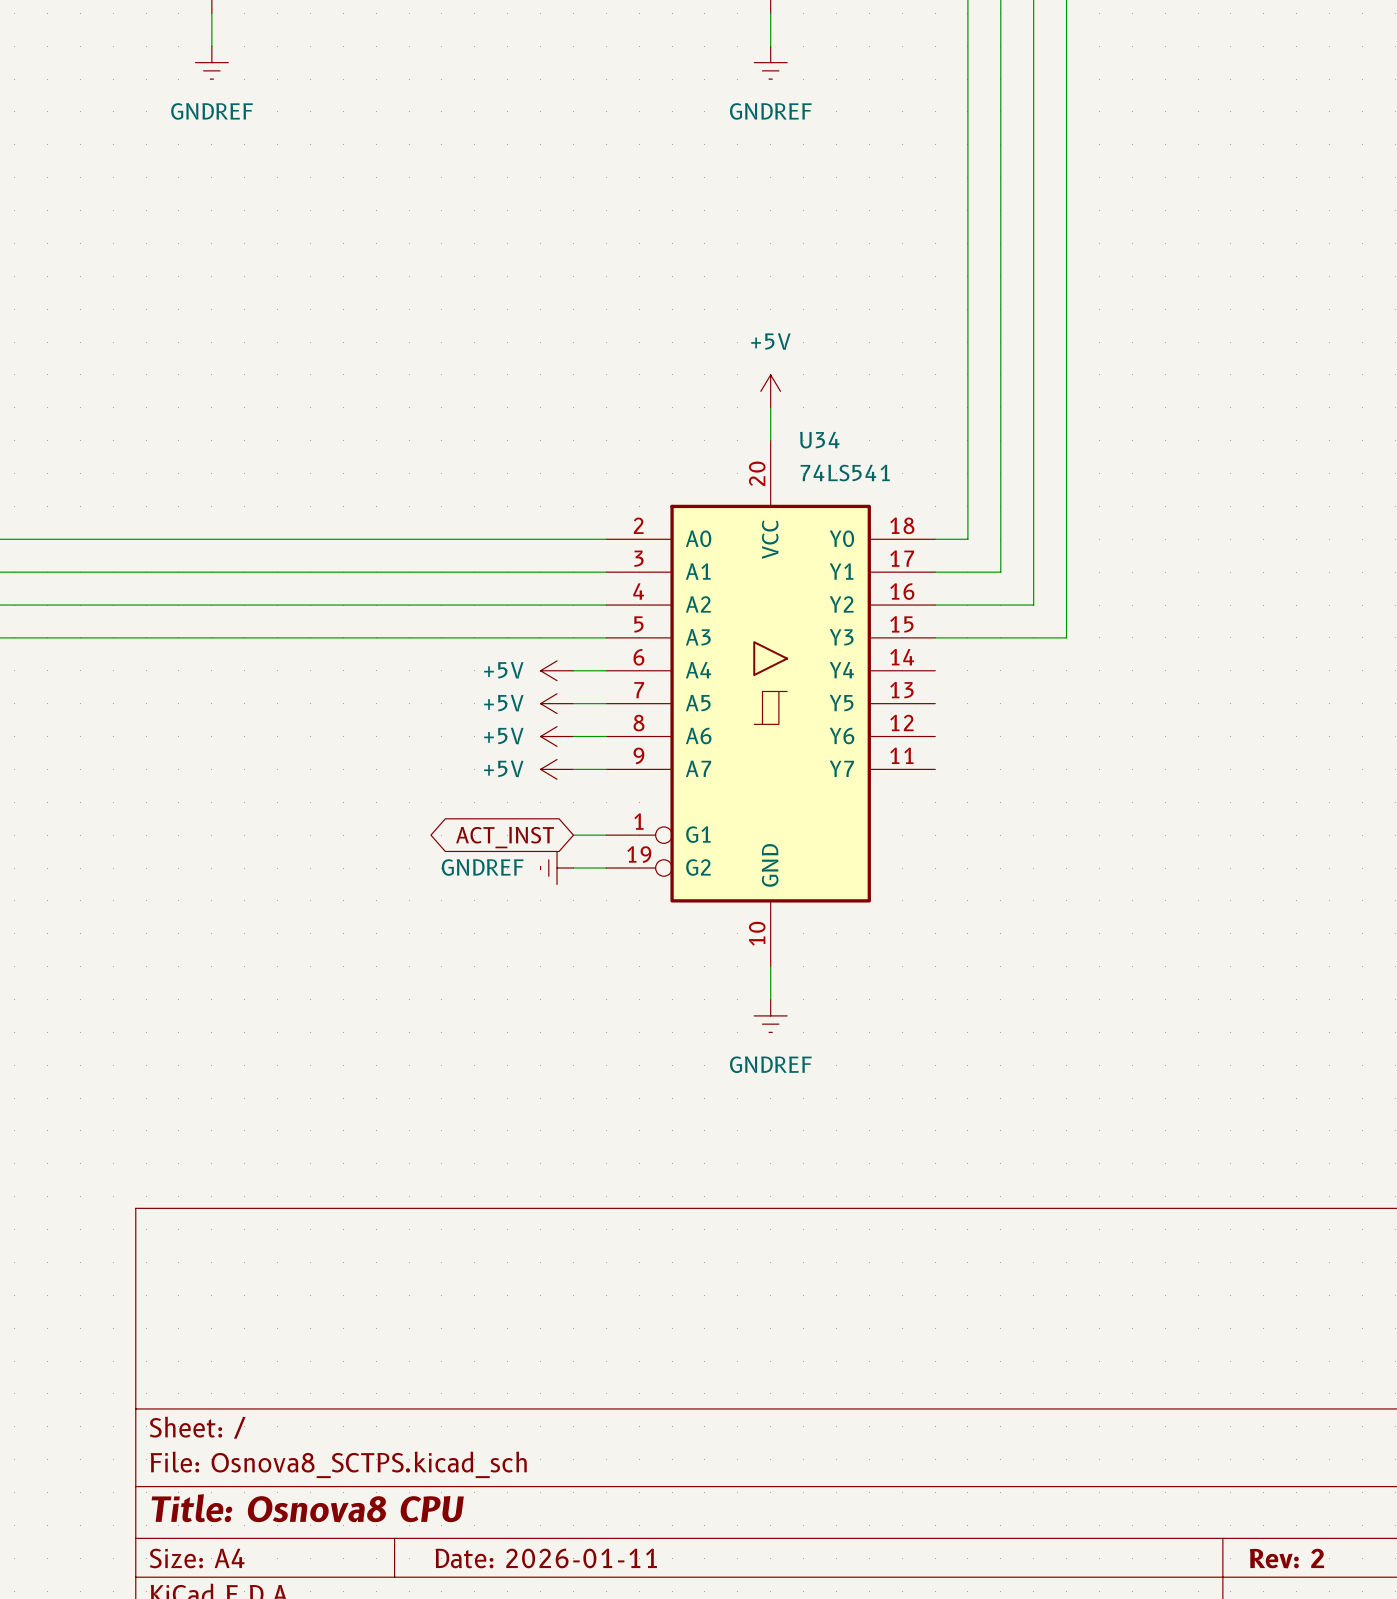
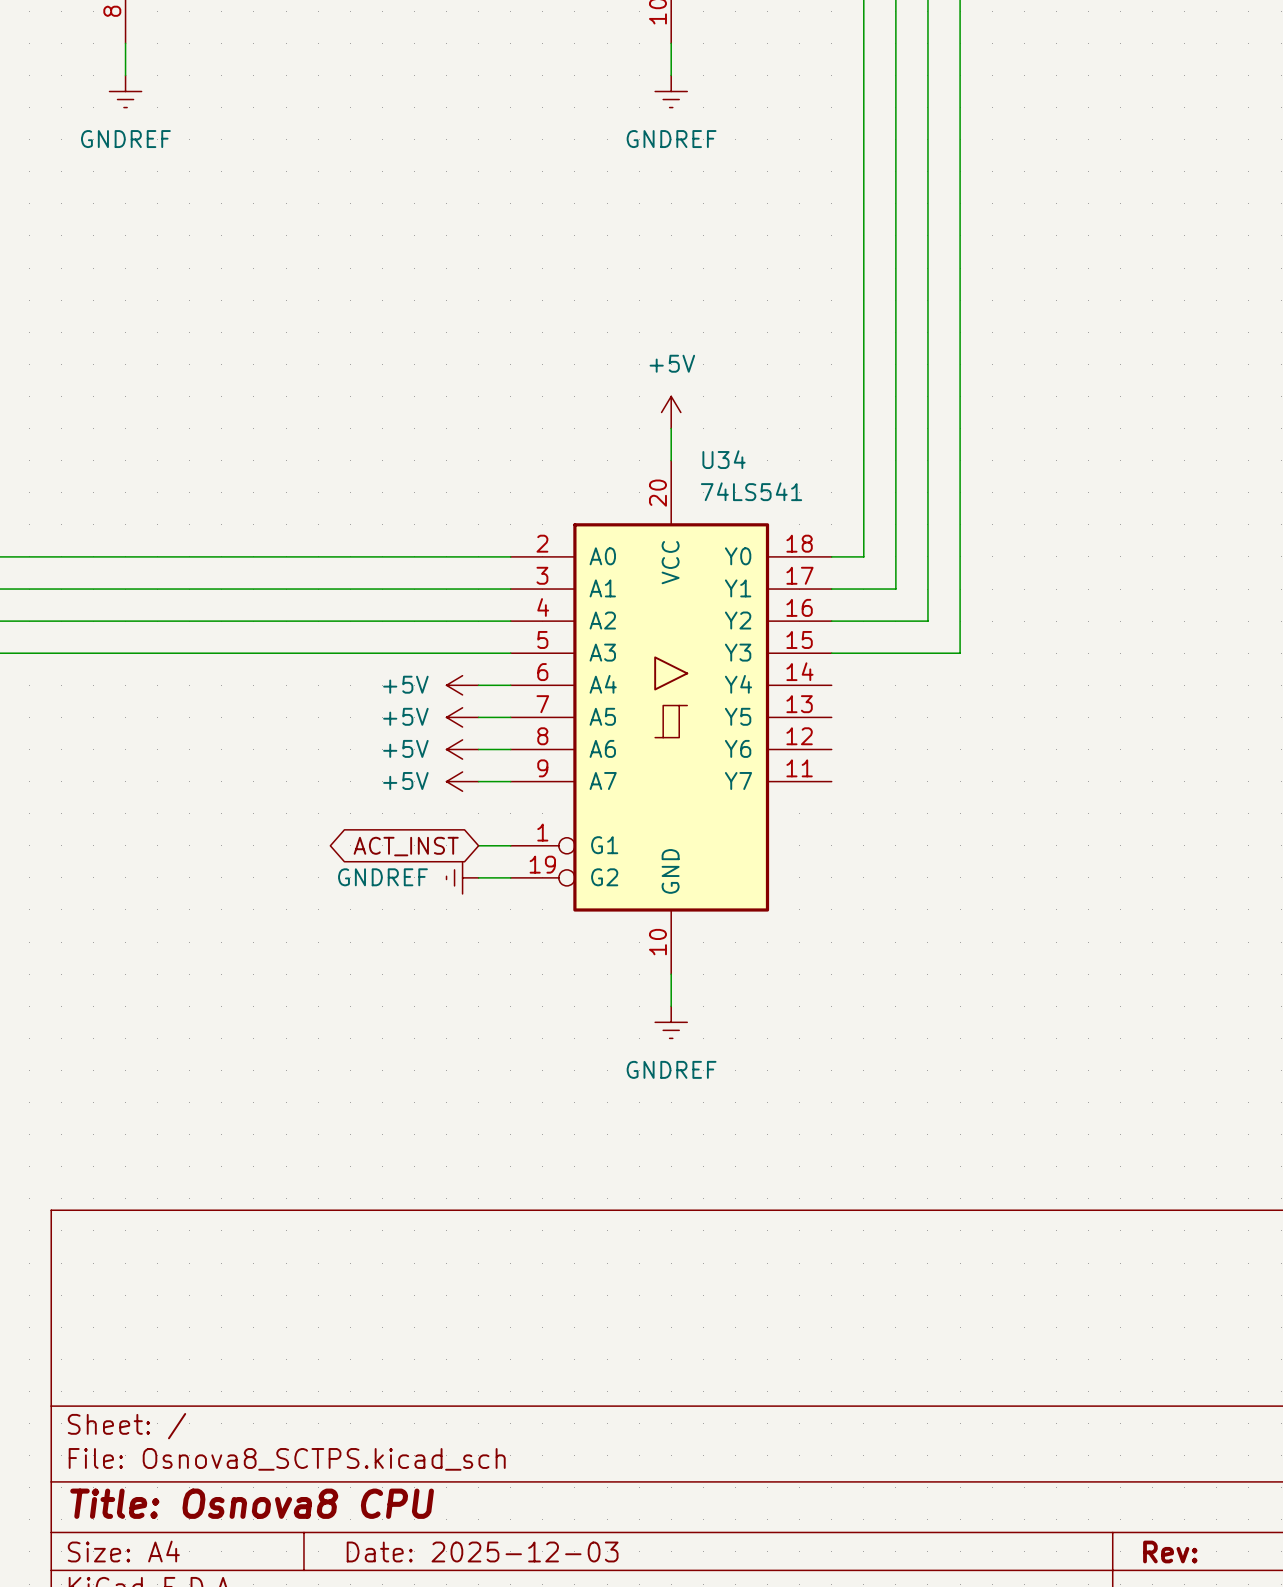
title block: Date: 2026-01-11 (546, 1558) -> Date: 2025-12-03 (482, 1551)
title block: Rev: 2 (1286, 1558) -> Rev: (1170, 1551)

